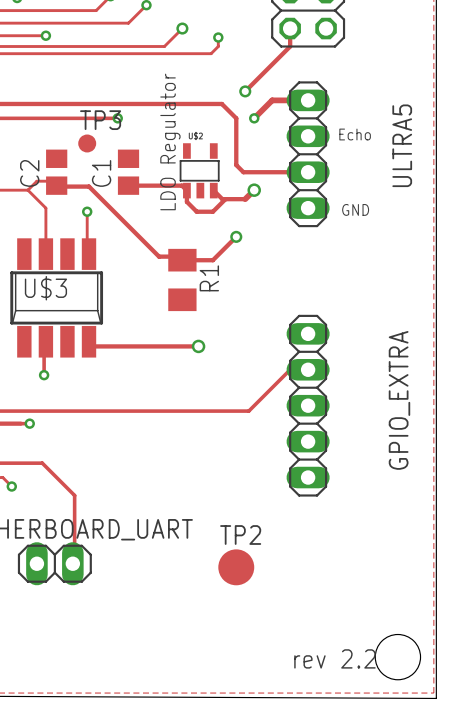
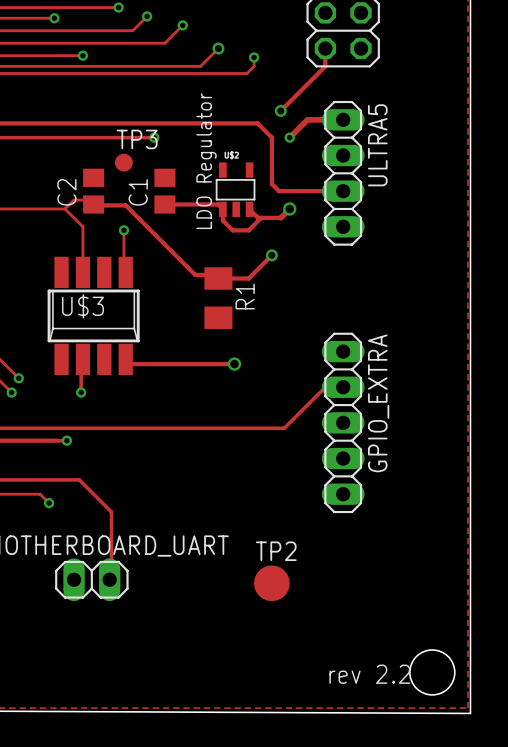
text: Echo (355, 134) -> none
ULTRA5 name position: ULTRA5 (402, 145) -> ULTRA5 (377, 145)
text: GND (355, 209) -> none
GPIO_EXTRA name position: GPIO_EXTRA (399, 400) -> GPIO_EXTRA (378, 403)

